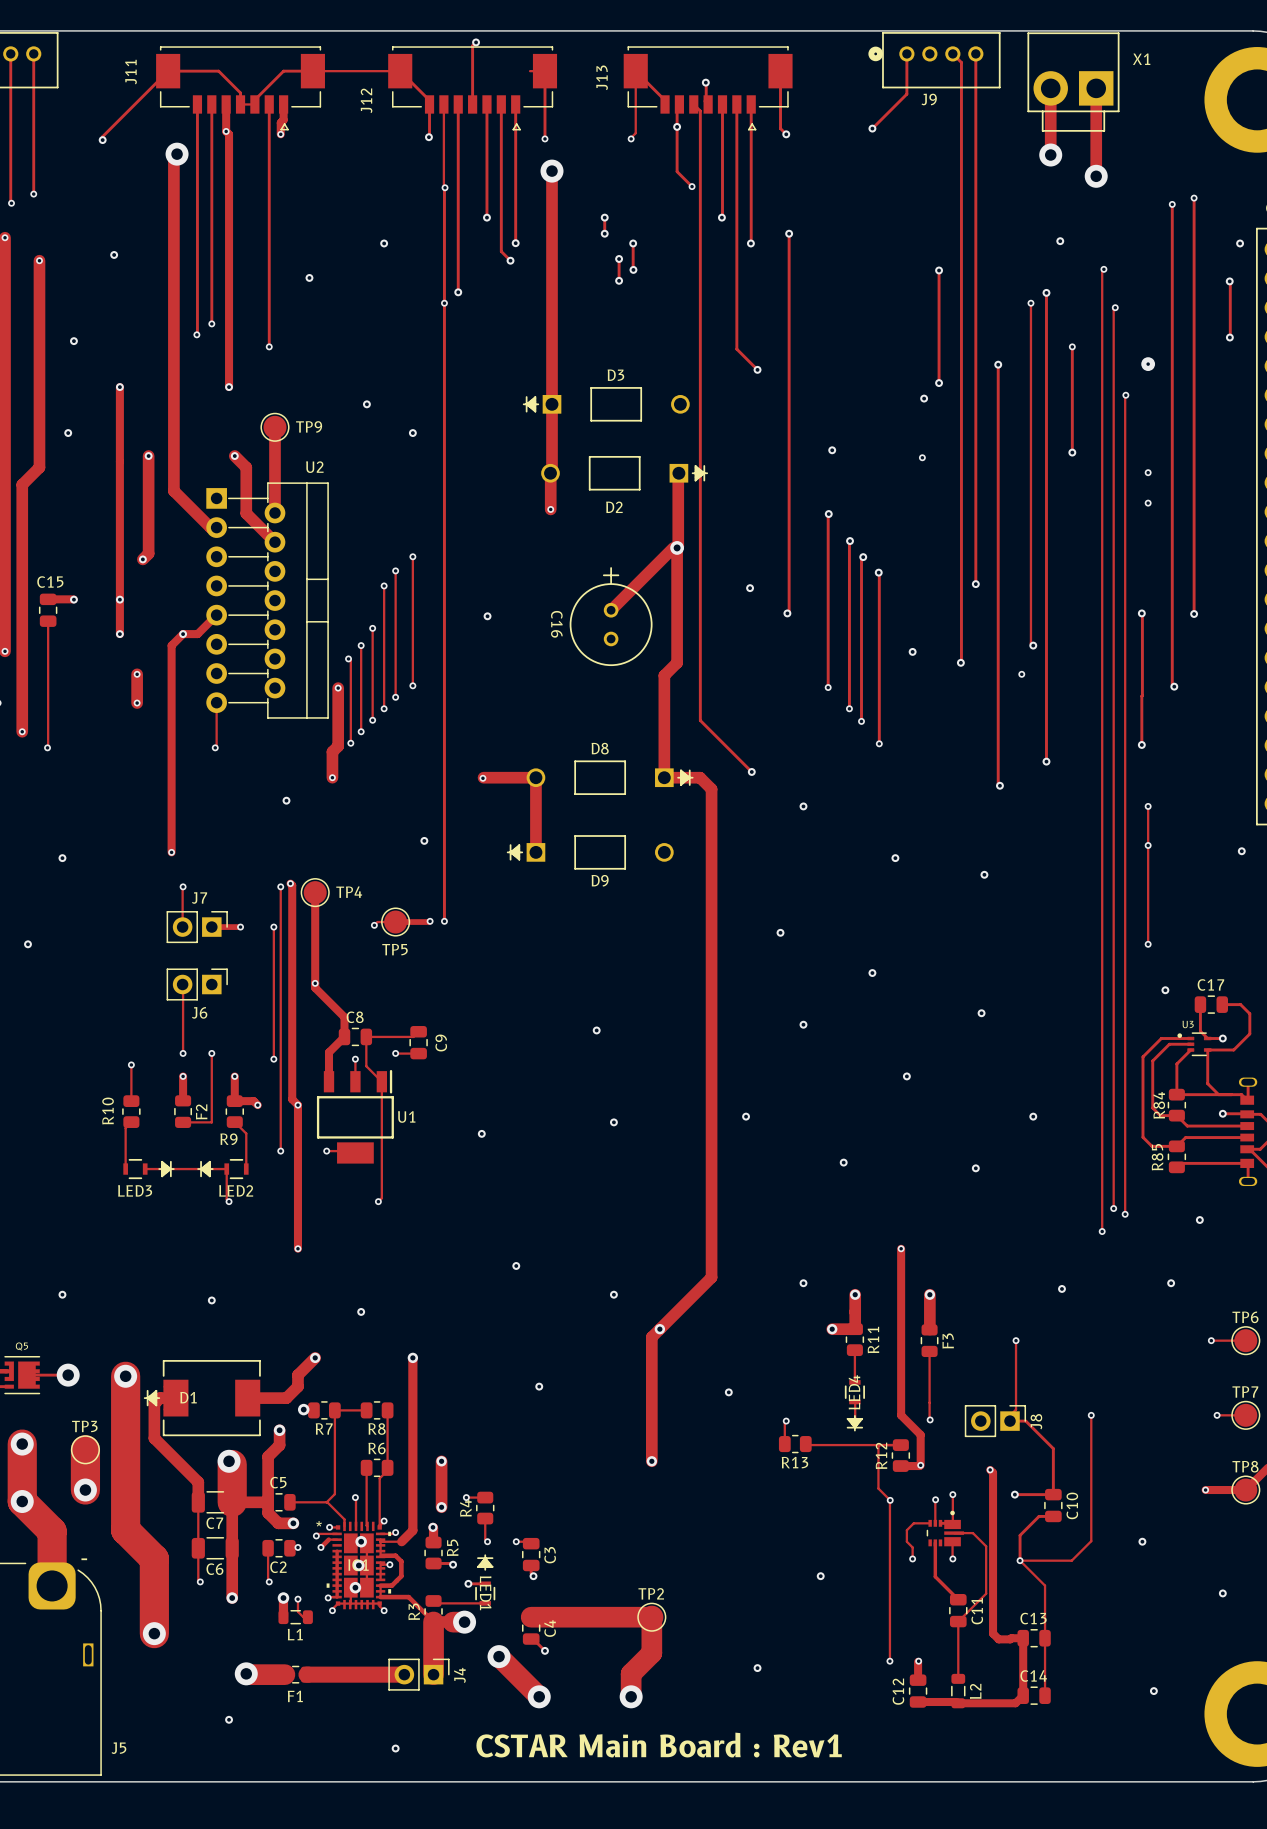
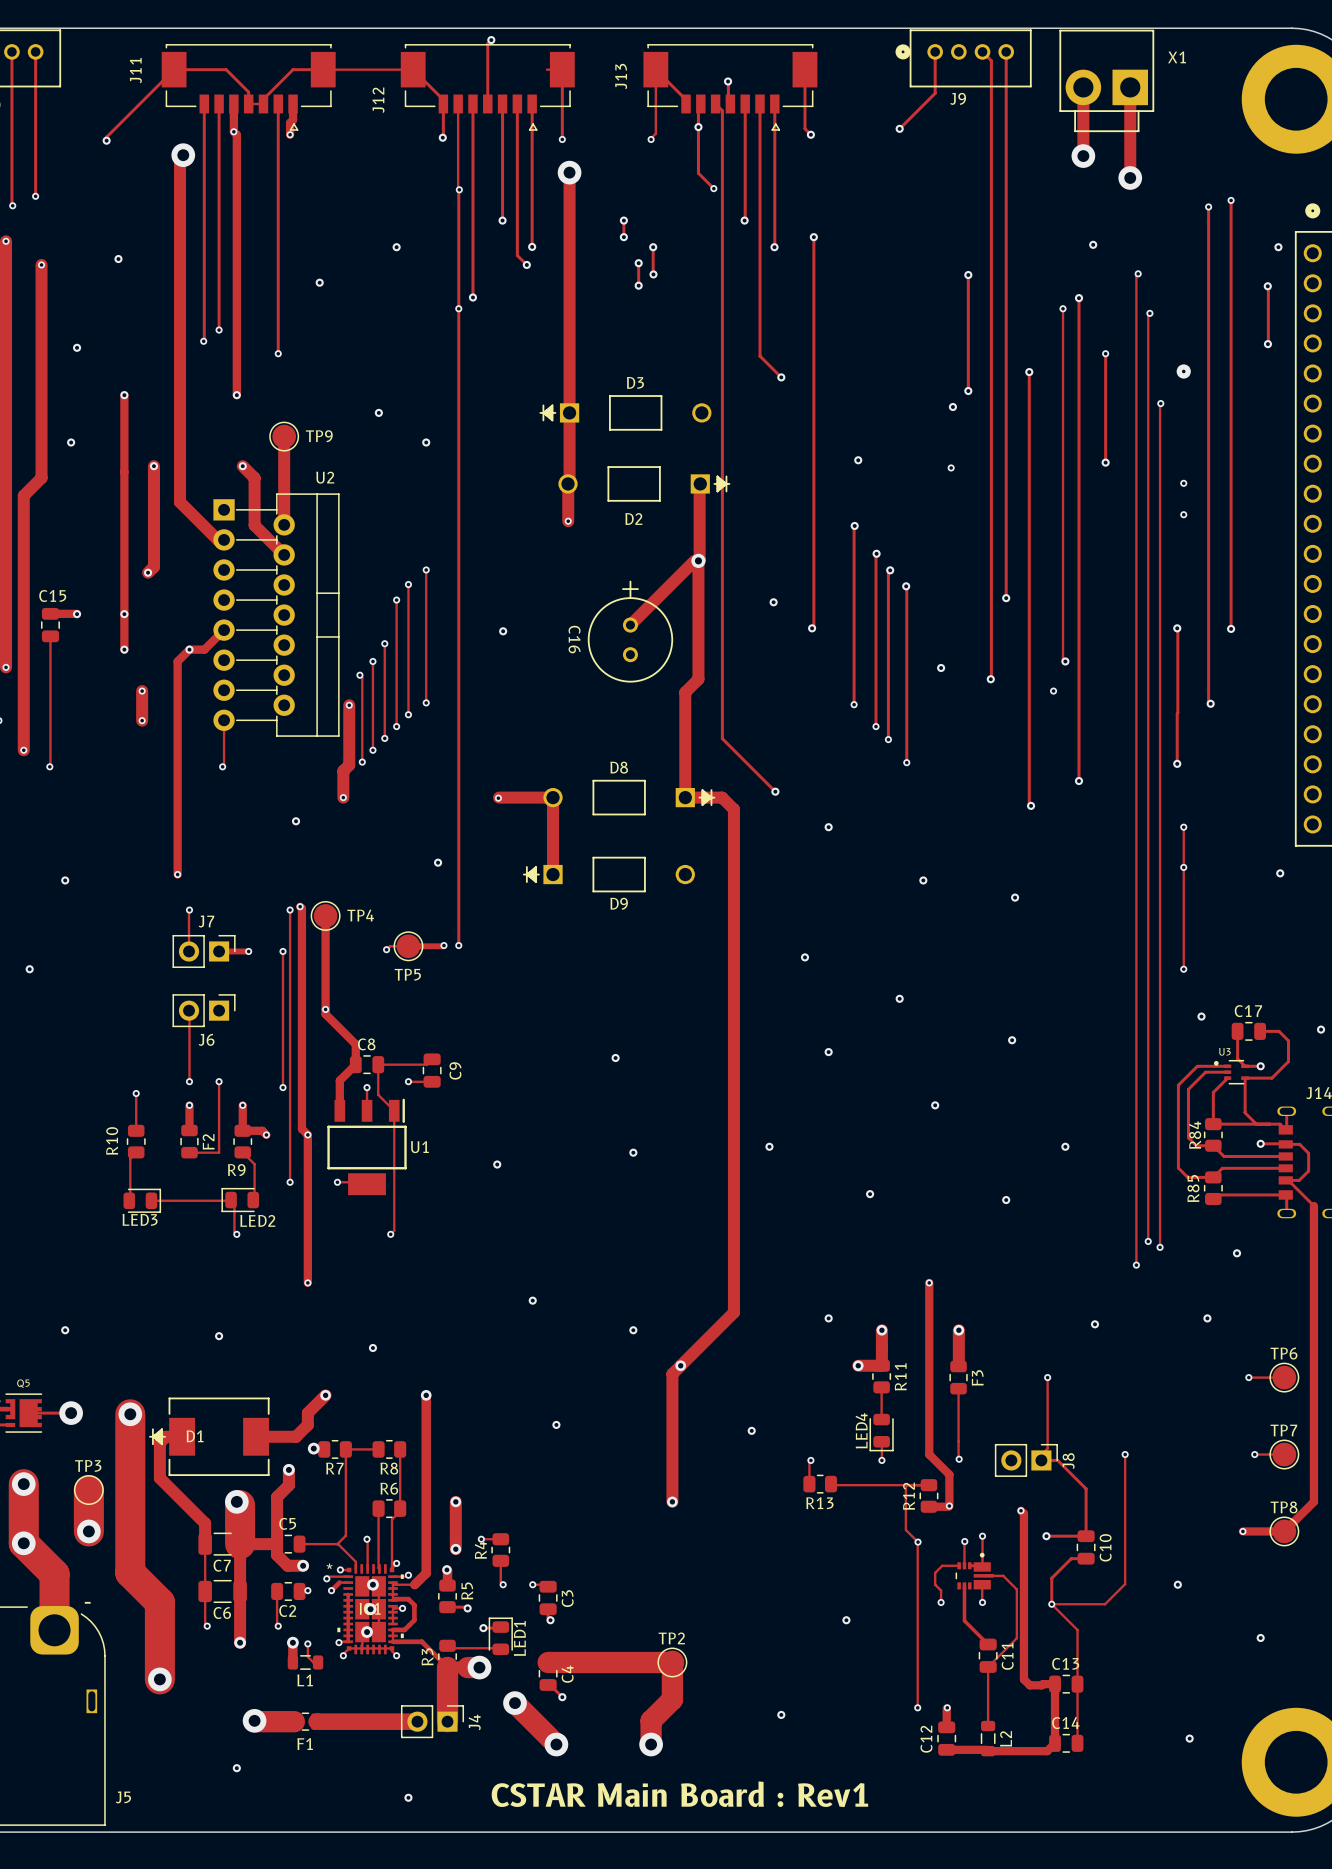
LED3 footprint: [123, 1158, 175, 1180] -> [123, 1188, 162, 1213]
LED2 footprint: [197, 1158, 249, 1180] -> [221, 1187, 260, 1213]
LED4 footprint: [844, 1380, 865, 1432] -> [869, 1413, 894, 1452]
LED1 footprint: [475, 1554, 496, 1606] -> [488, 1617, 513, 1656]

